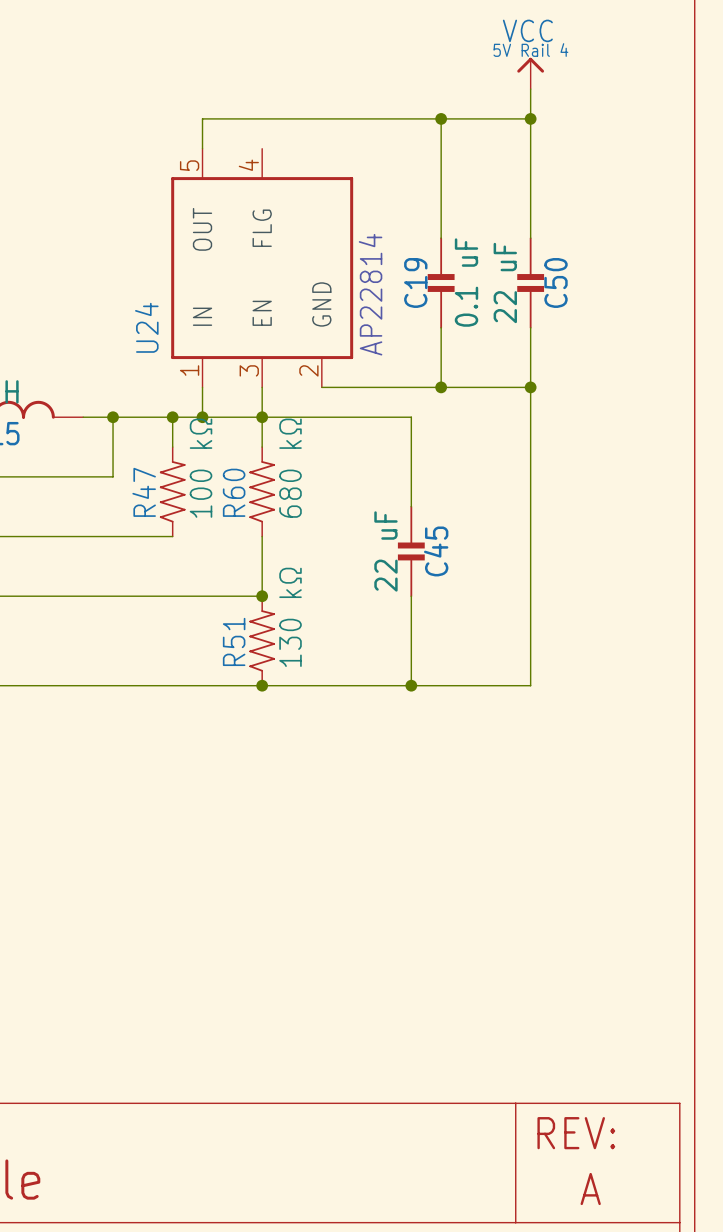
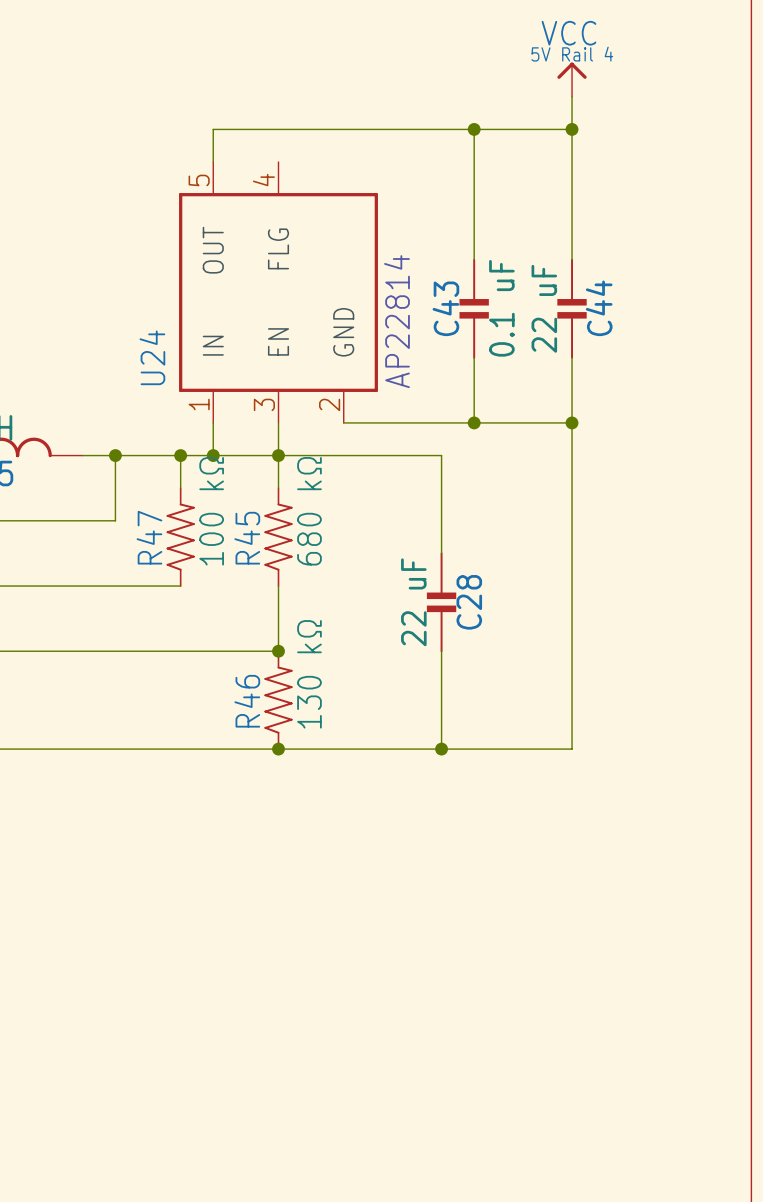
C19 name: C19 (415, 282) -> C43 (445, 308)
C50 name: C50 (556, 282) -> C44 (599, 308)
R60 name: R60 (234, 492) -> R45 (247, 538)
C45 name: C45 (436, 551) -> C28 (469, 602)
R51 name: R51 (234, 641) -> R46 (247, 701)

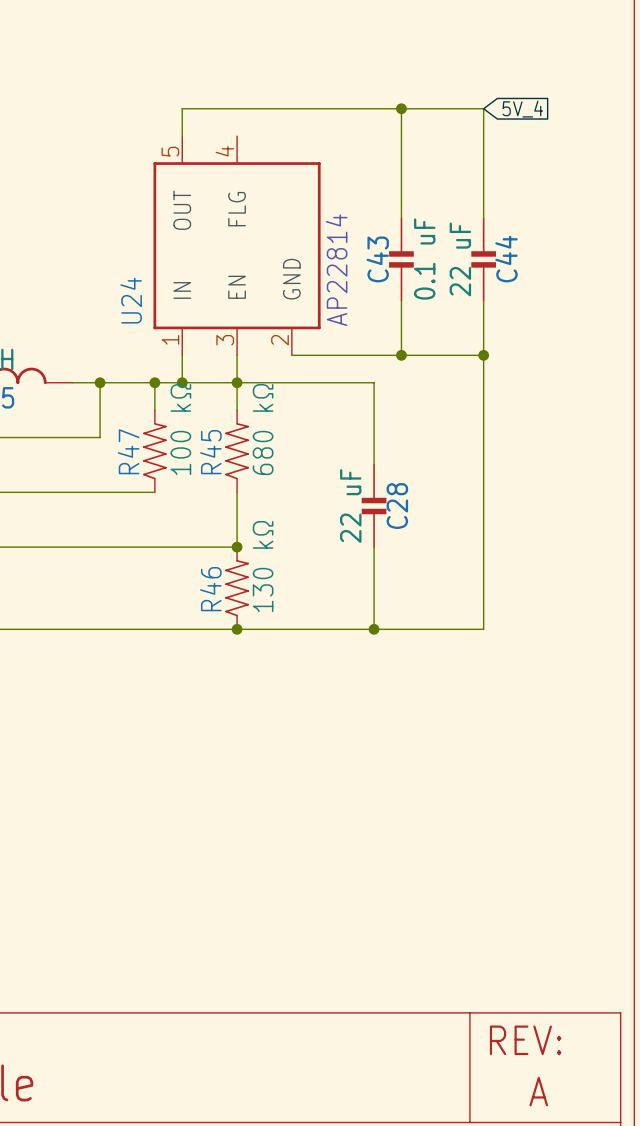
power symbol: (572, 79) -> none
wire: (572, 96) (572, 129) -> none
junction: (572, 129) -> none
global label: none -> 5V_4 (522, 109)

